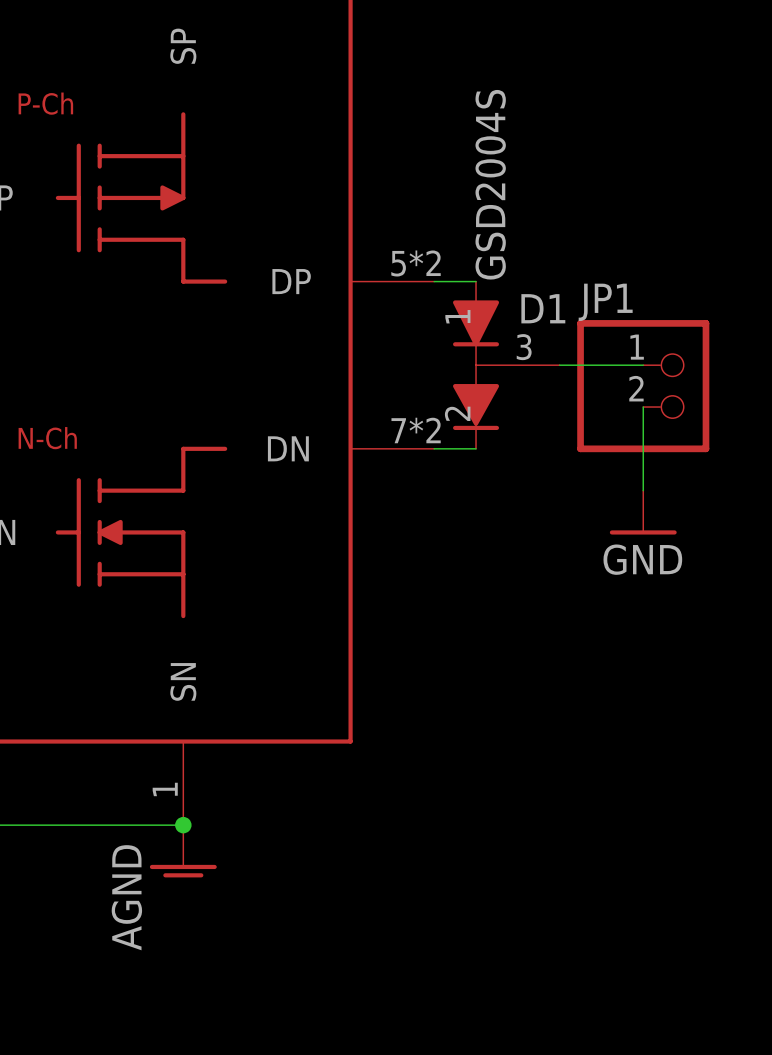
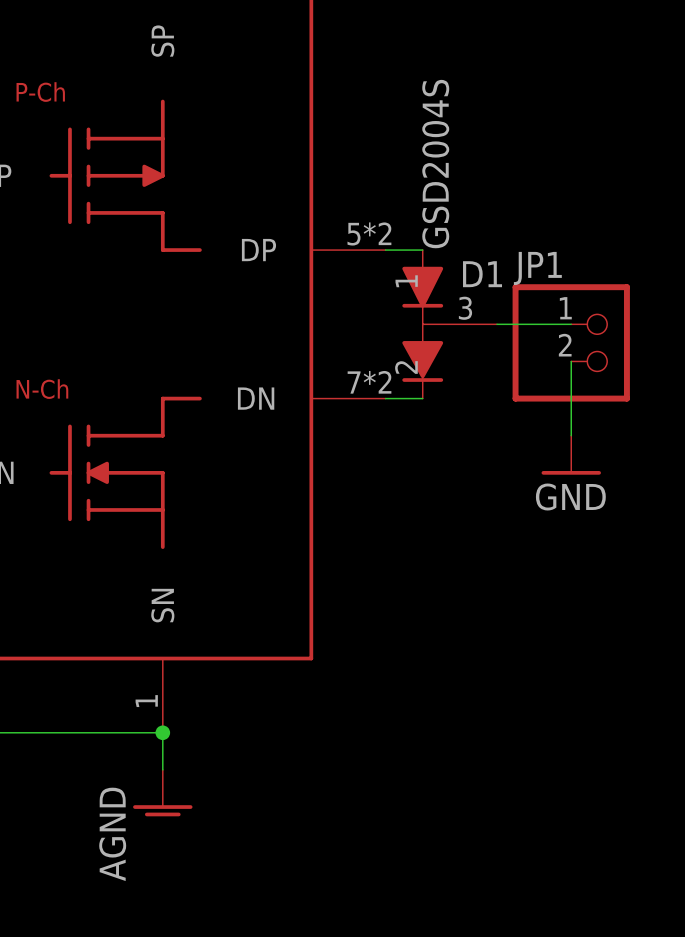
power symbol position: AGND (183, 851) -> AGND (162, 793)

